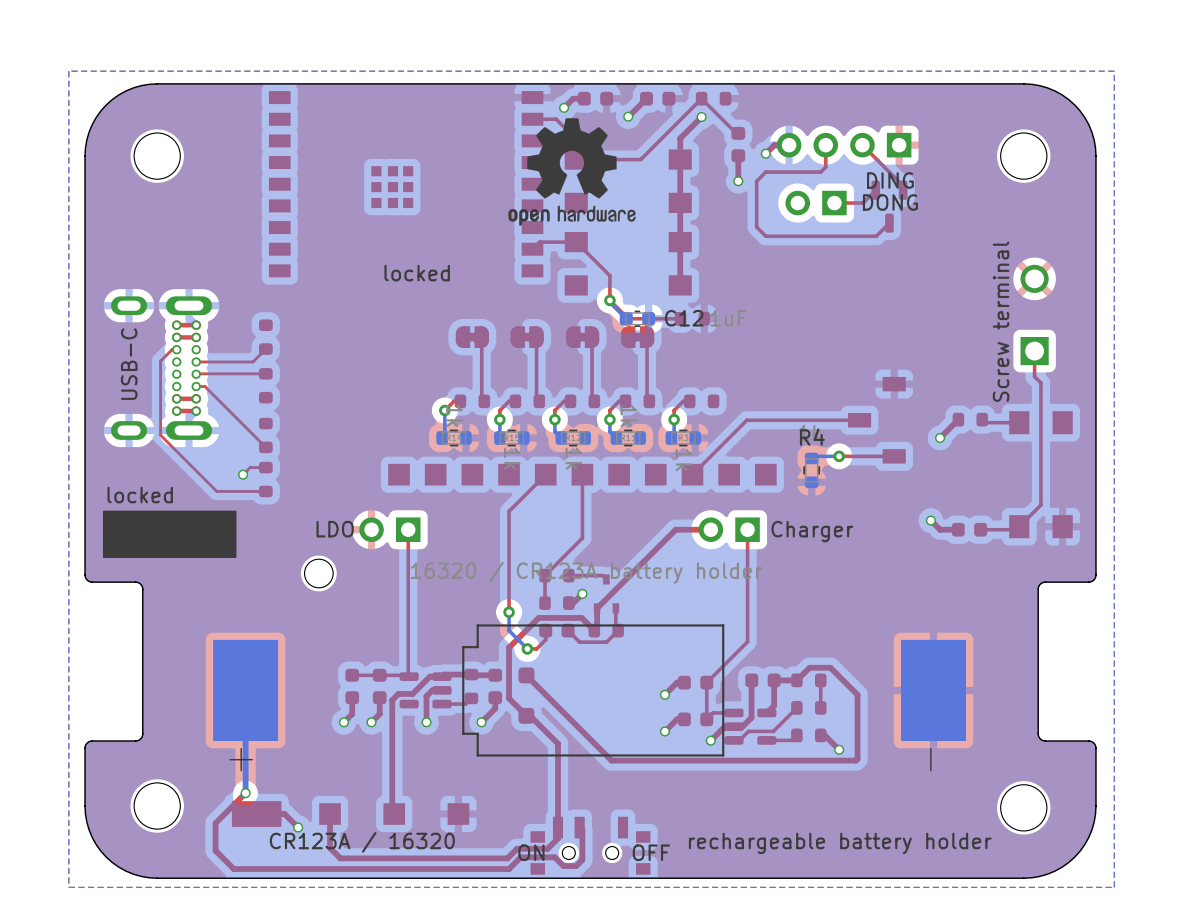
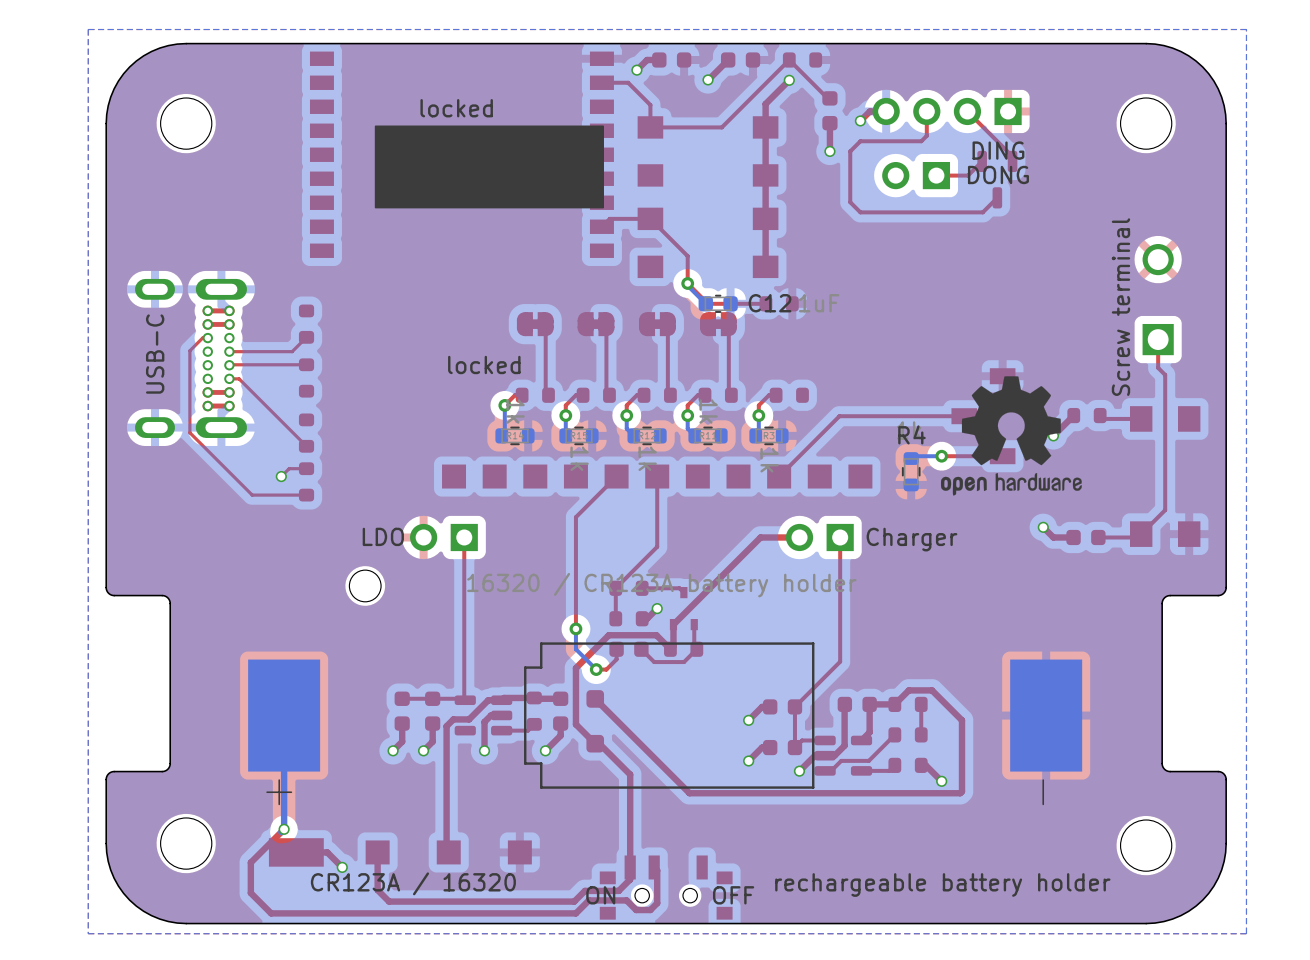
drawing: [508, 118, 636, 226] -> none
text: none -> locked (456, 108)
drawing: none -> [374, 125, 604, 209]
text: locked (417, 273) -> none
text: none -> locked (484, 364)
drawing: none -> [940, 376, 1082, 496]
text: locked (140, 495) -> none
drawing: [102, 510, 237, 558] -> none

